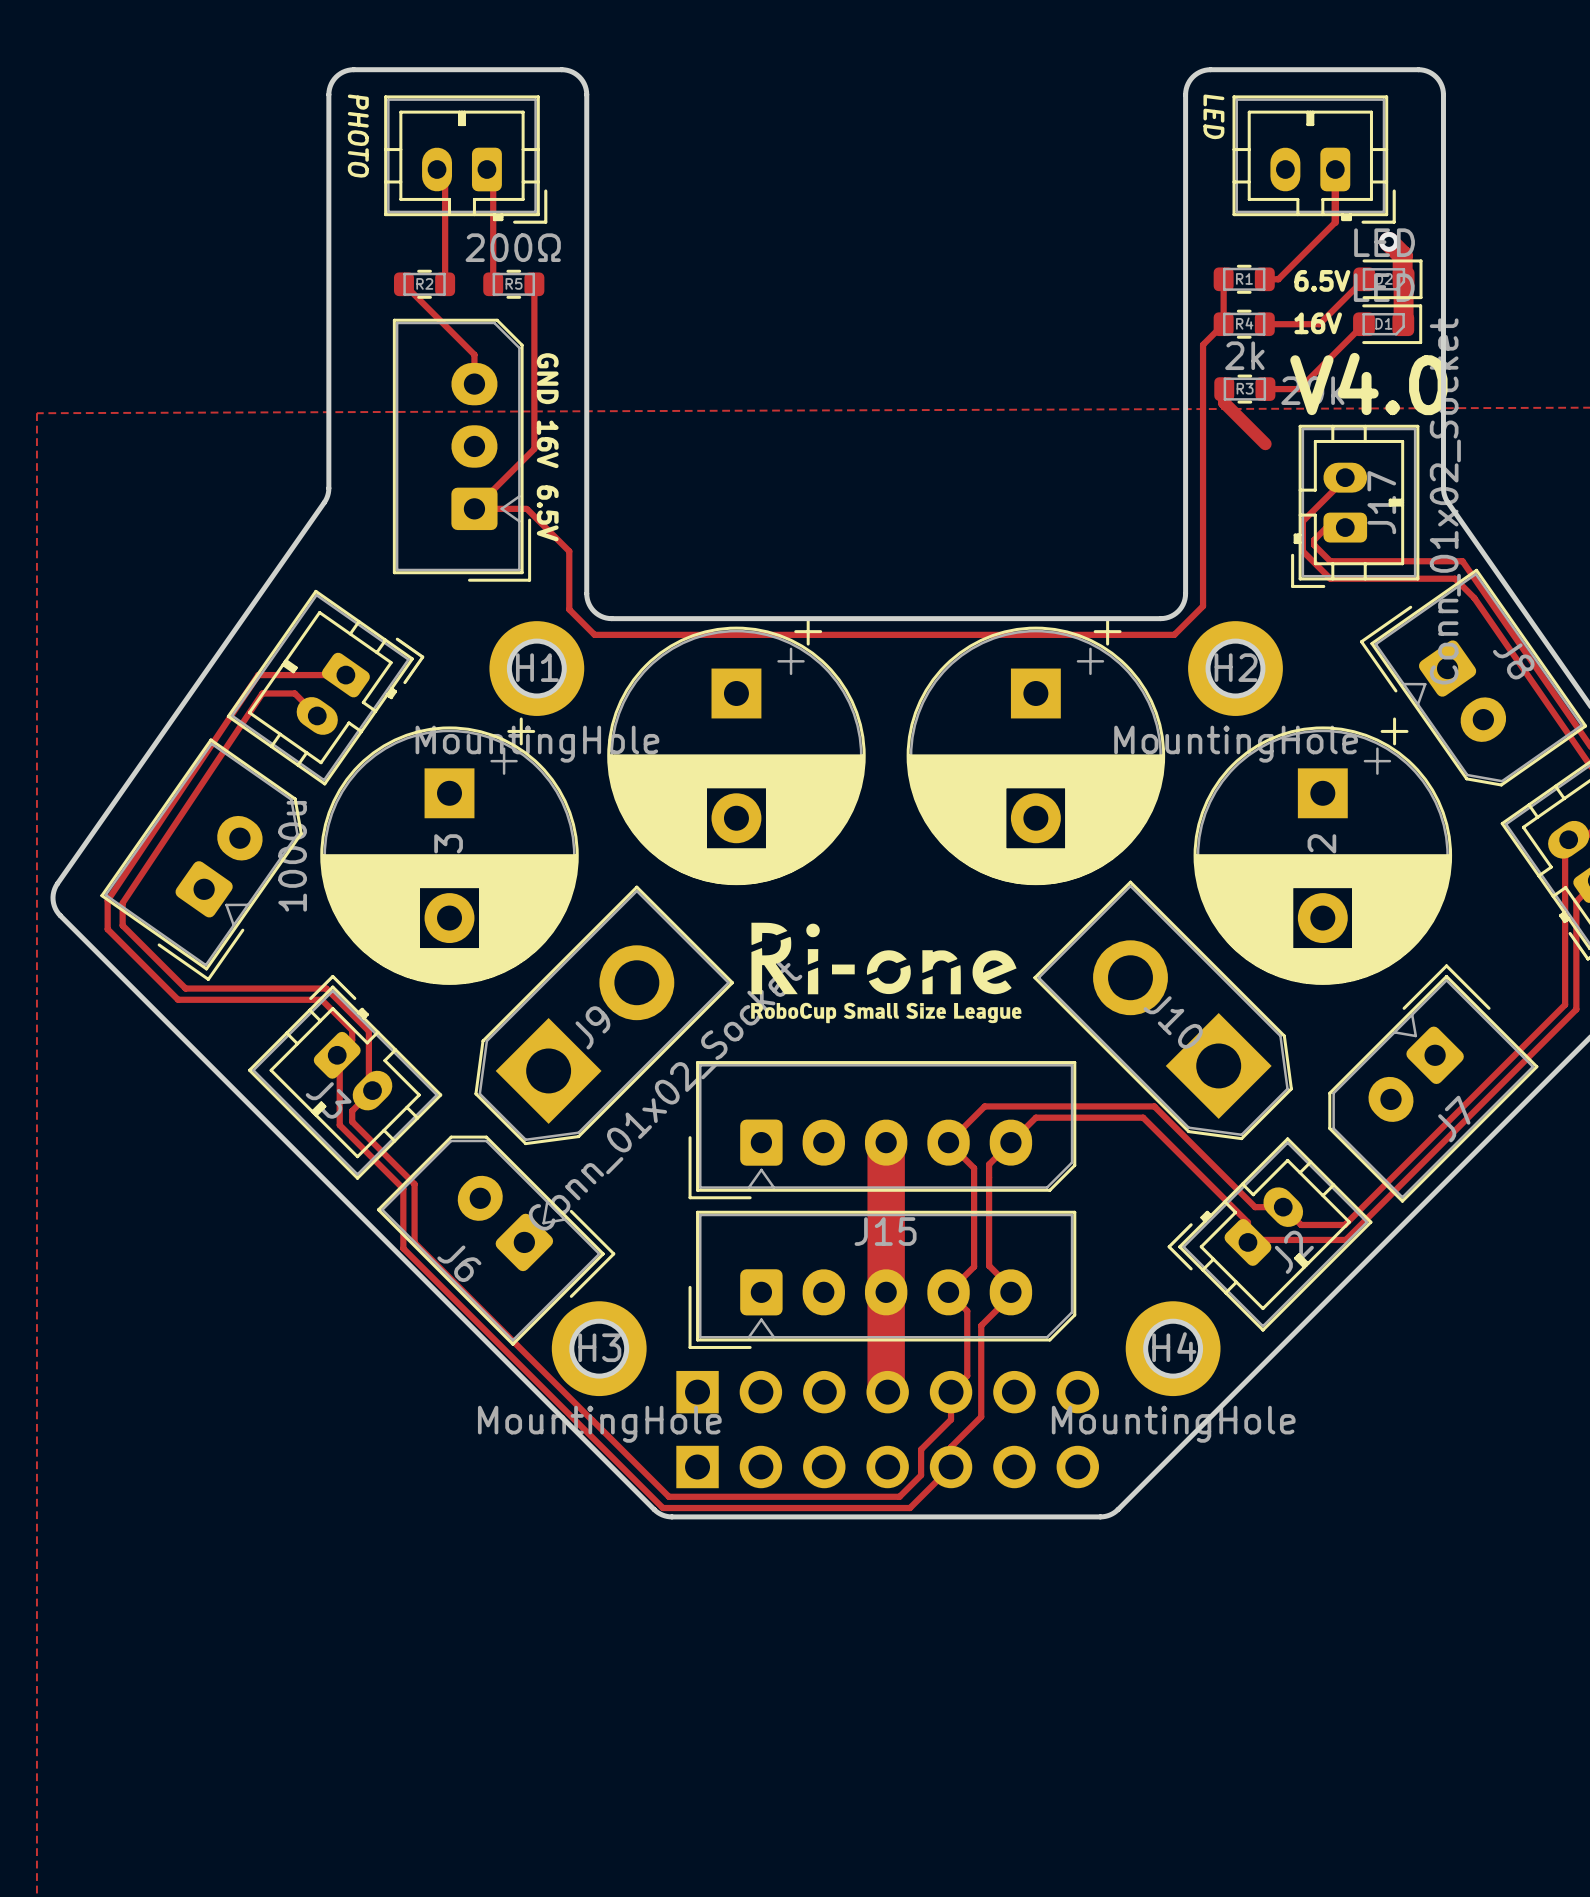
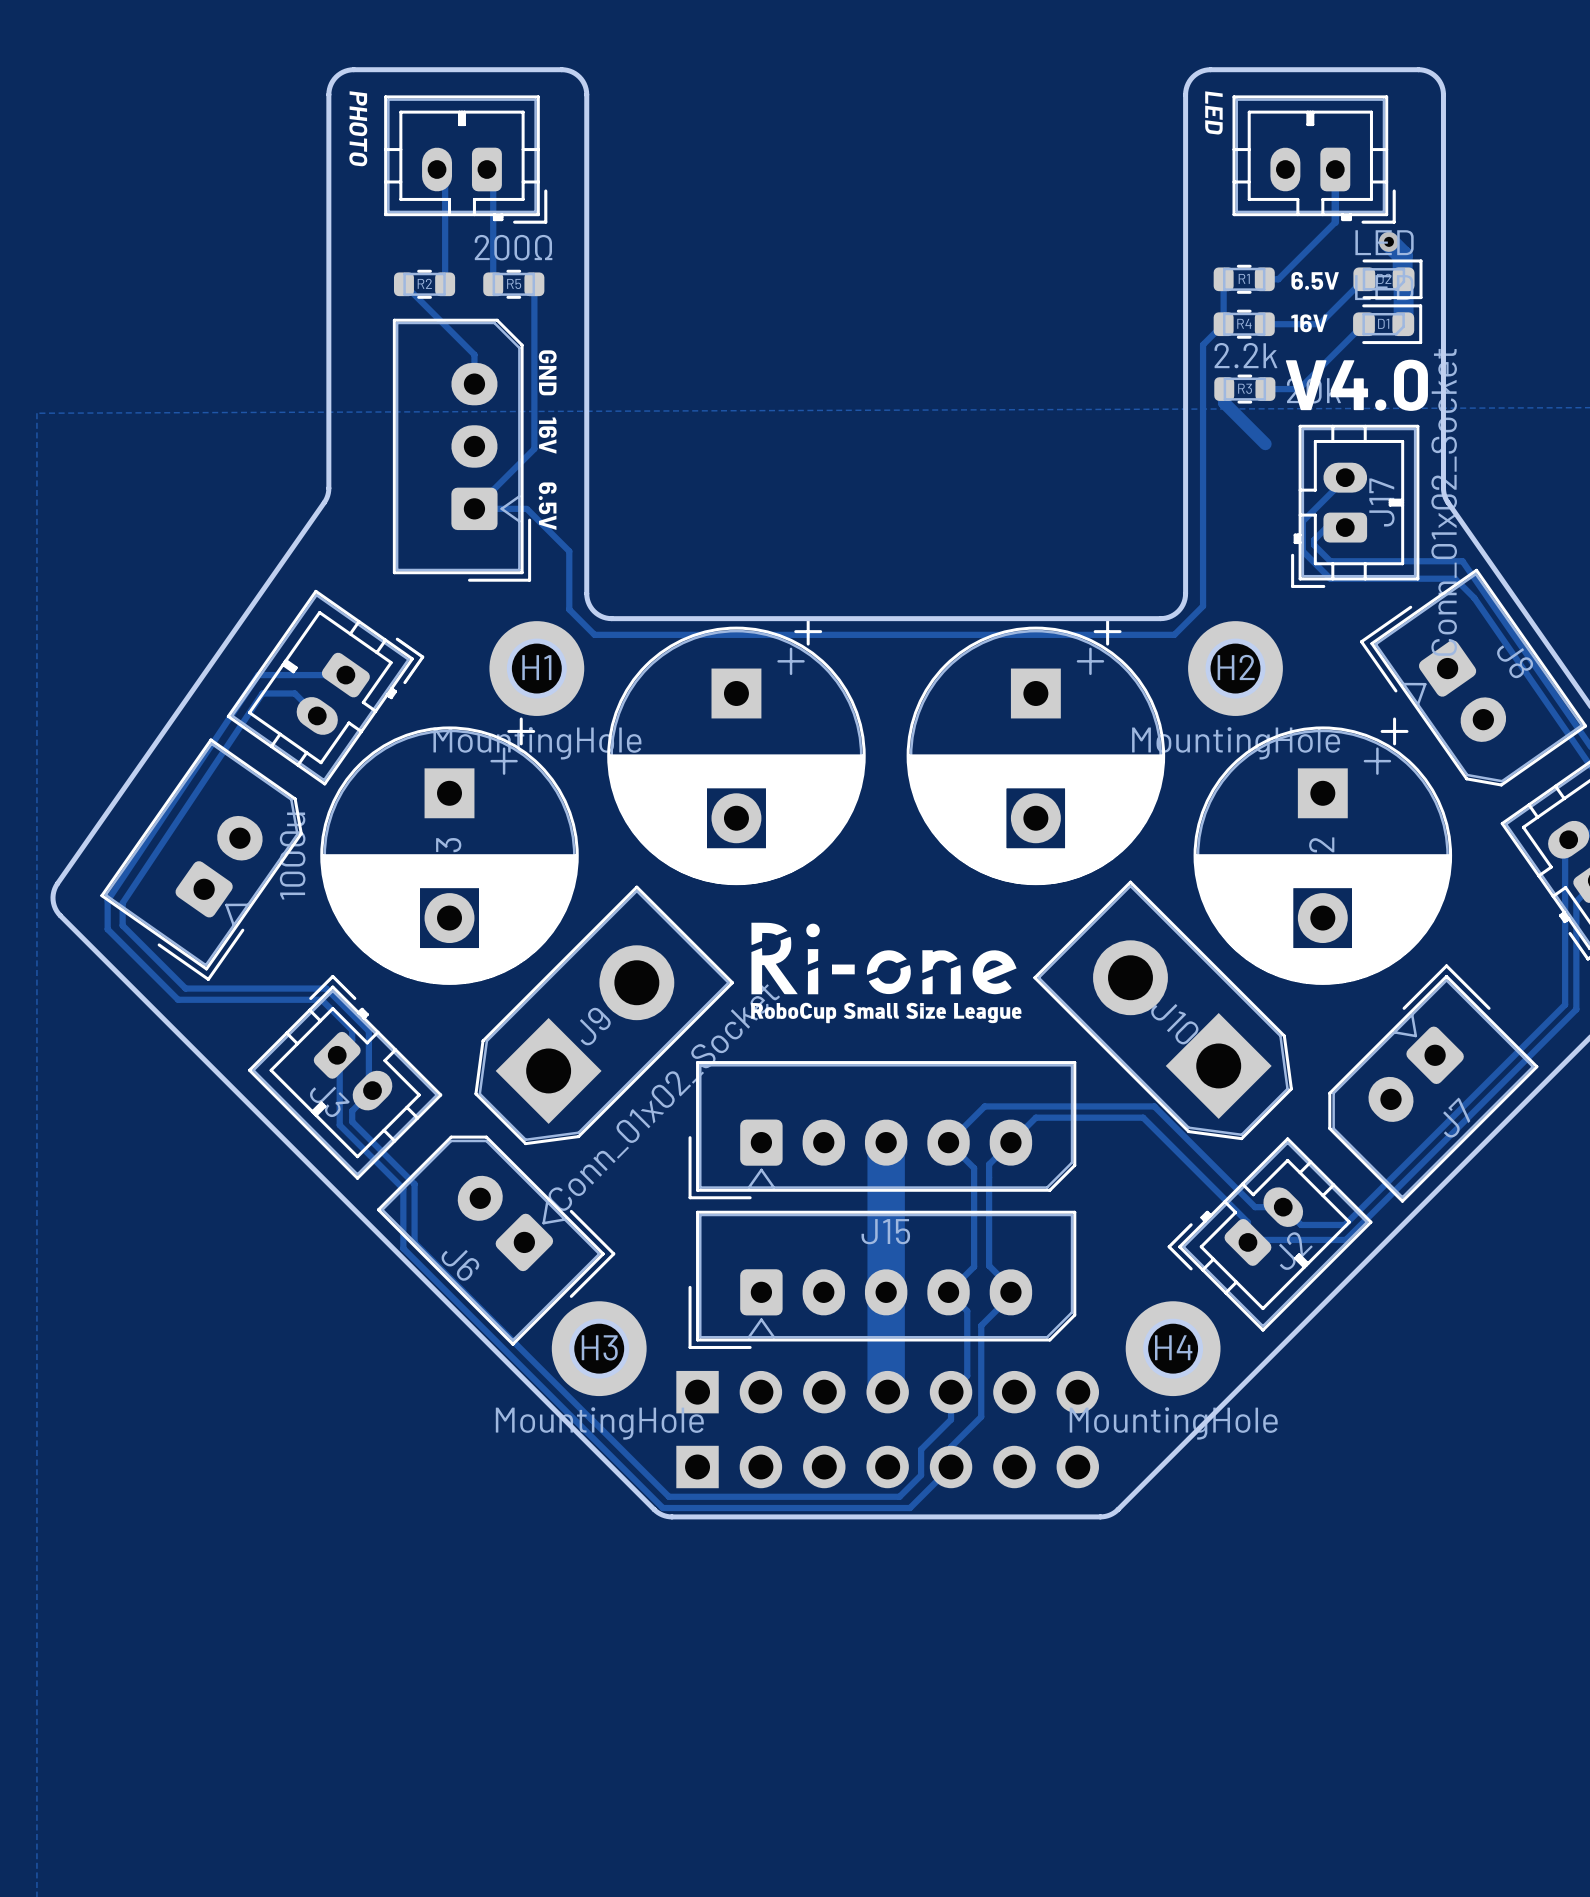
R4 value: 2k (1244, 355) -> 2.2k (1245, 355)

